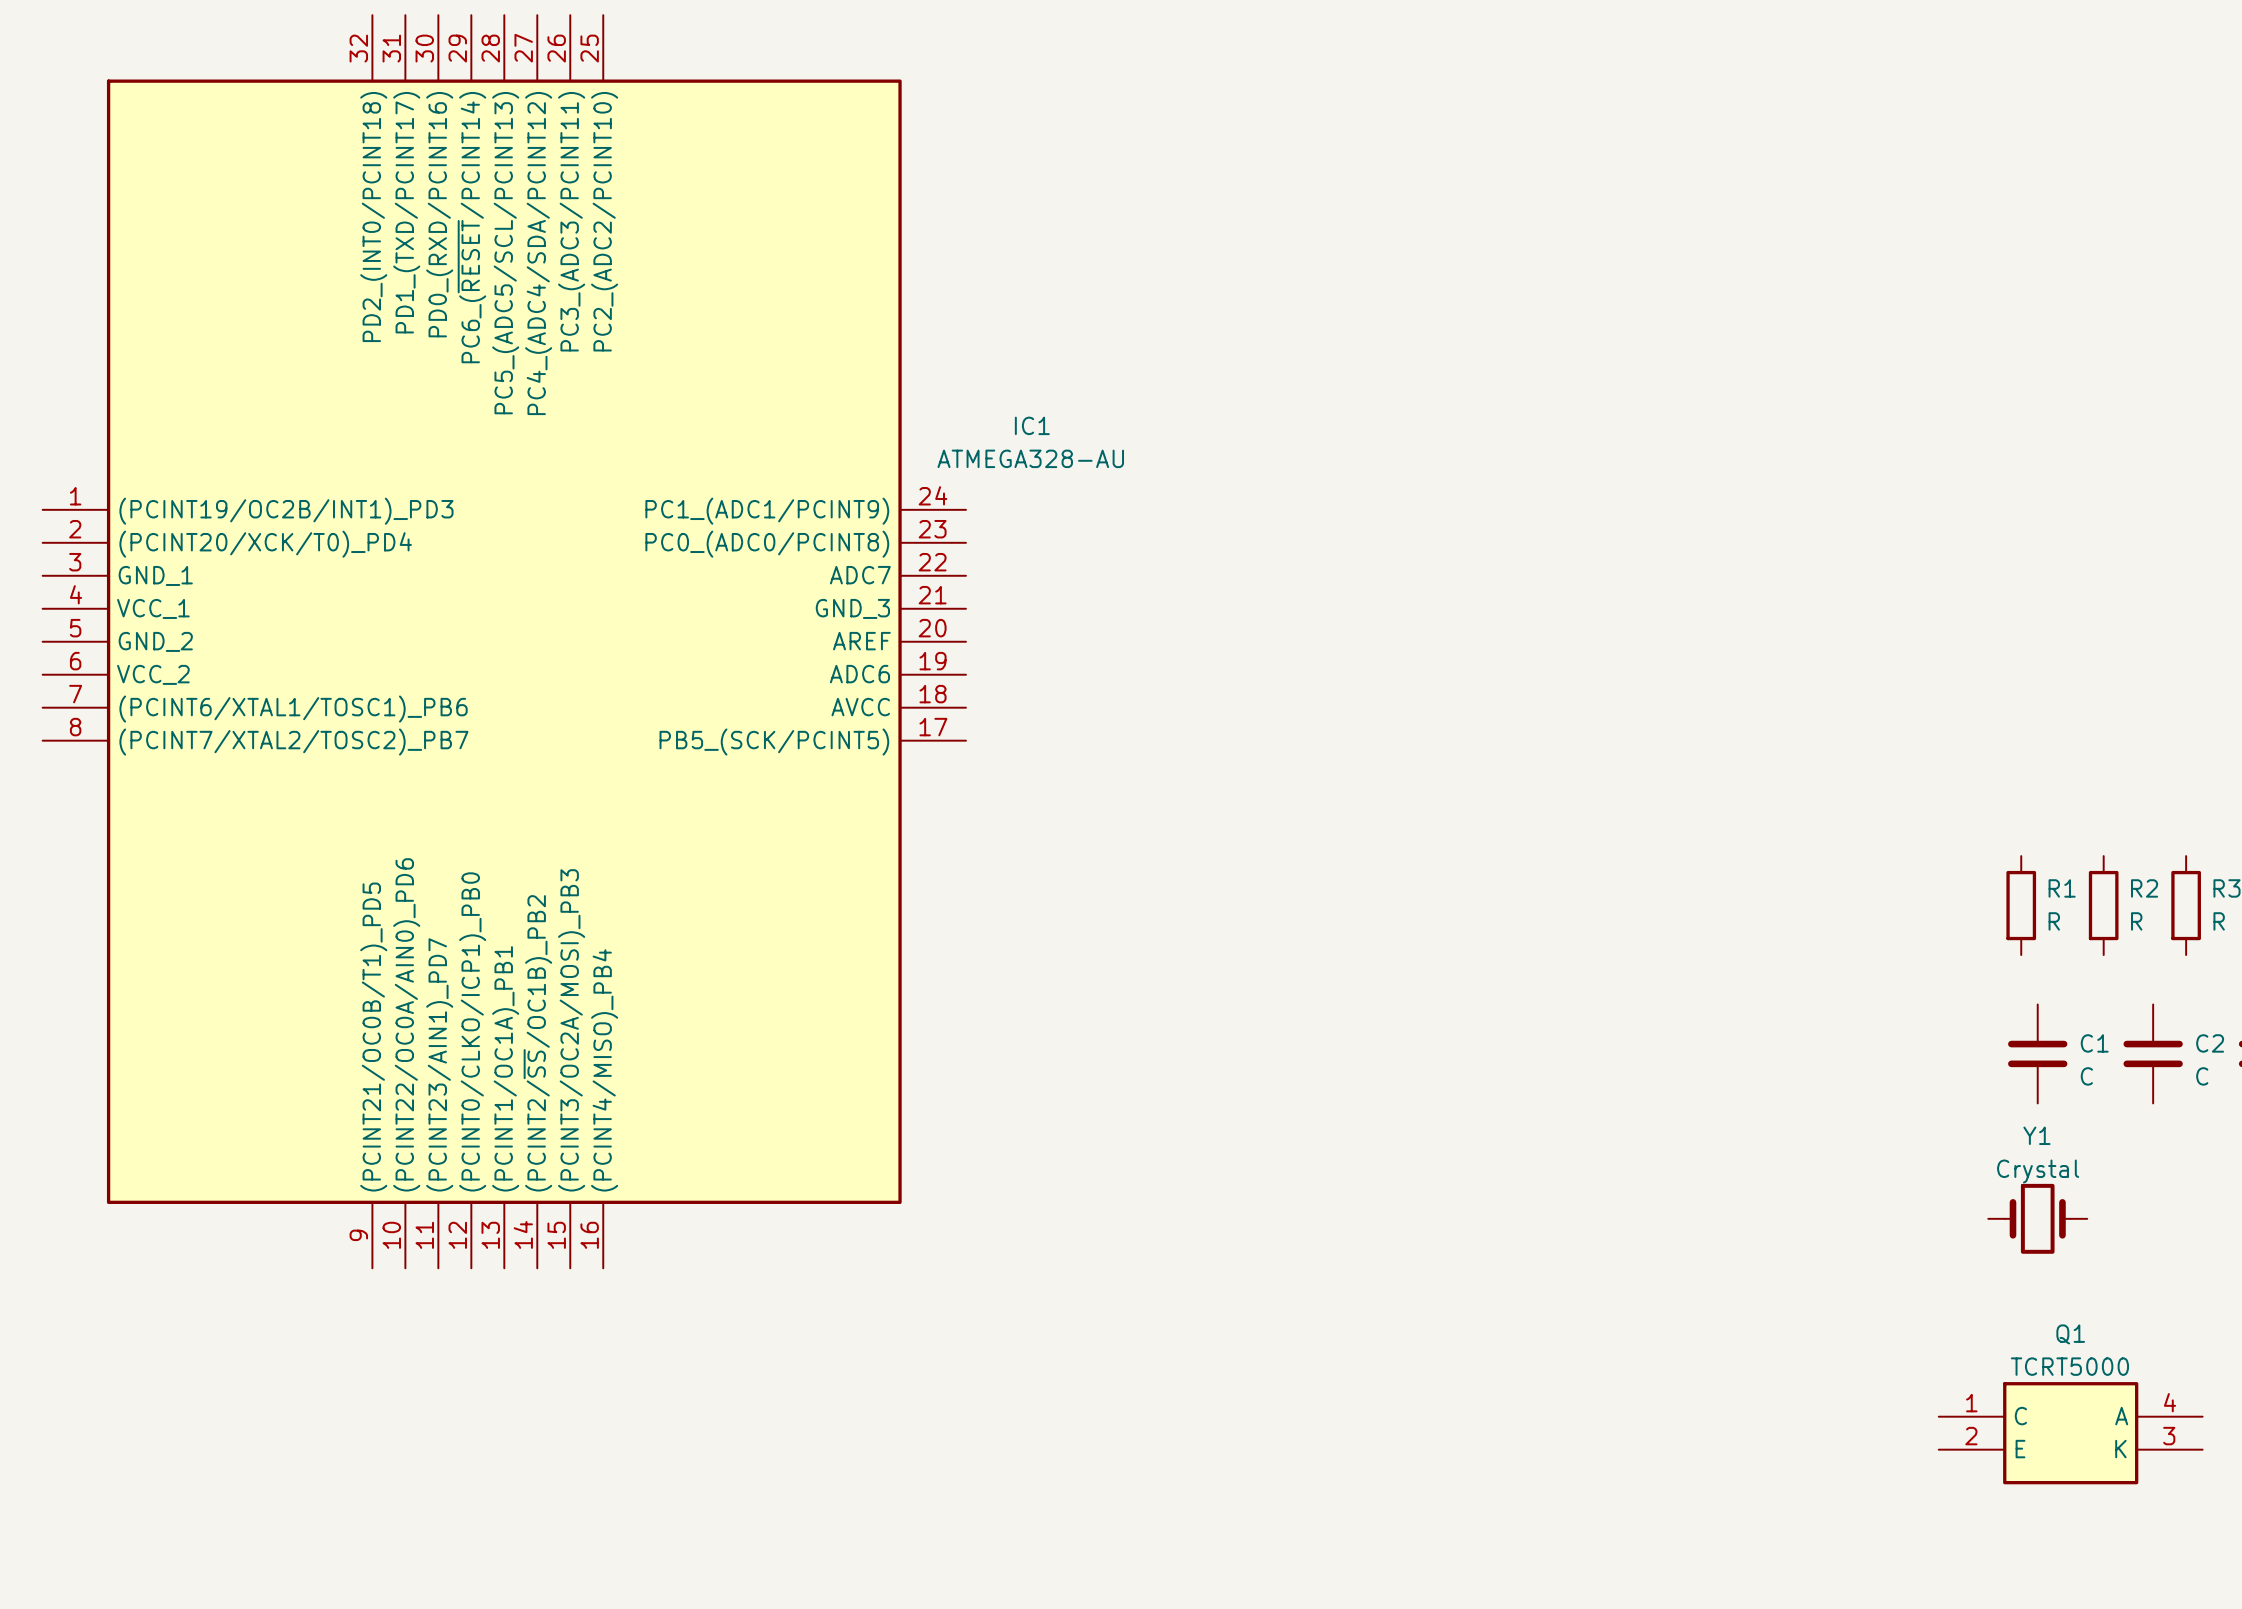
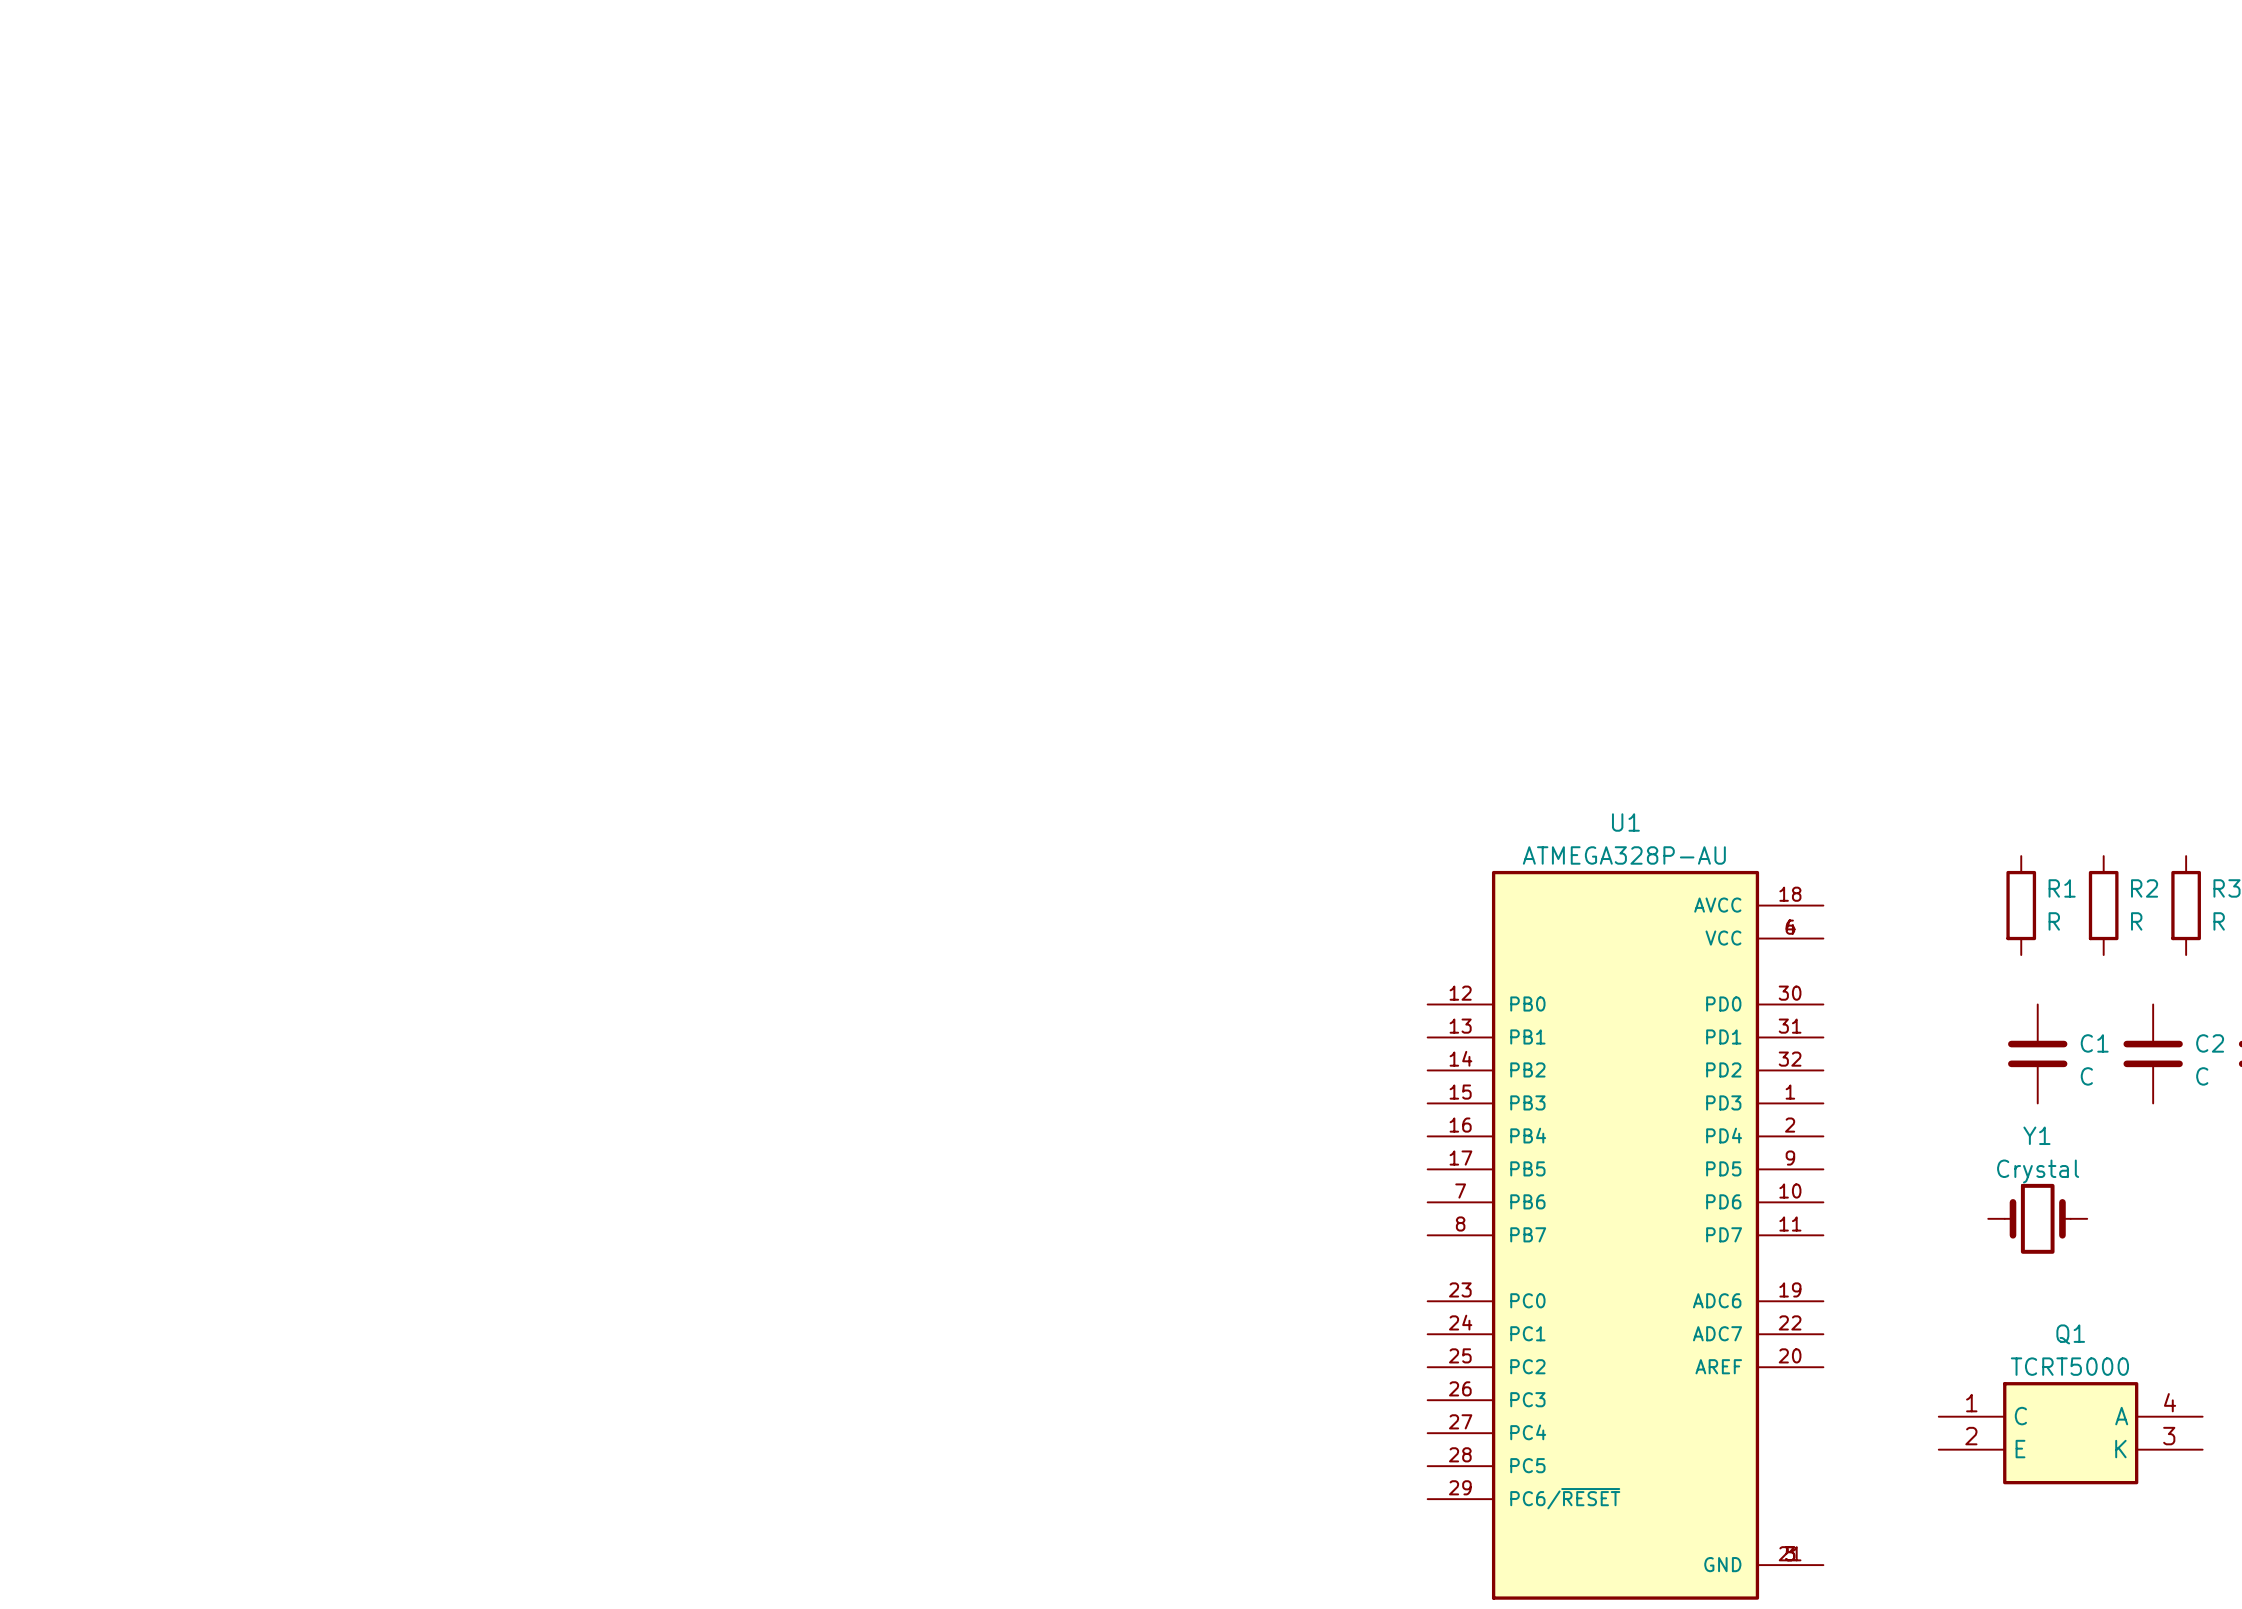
IC1: ATMEGA328-AU (504, 641) -> none
U1: none -> ATMEGA328P-AU (1625, 1235)

